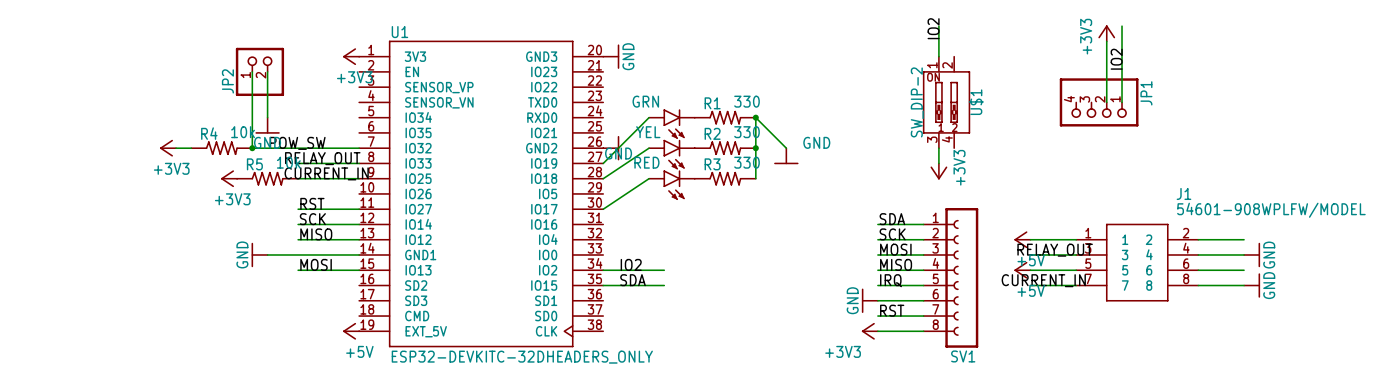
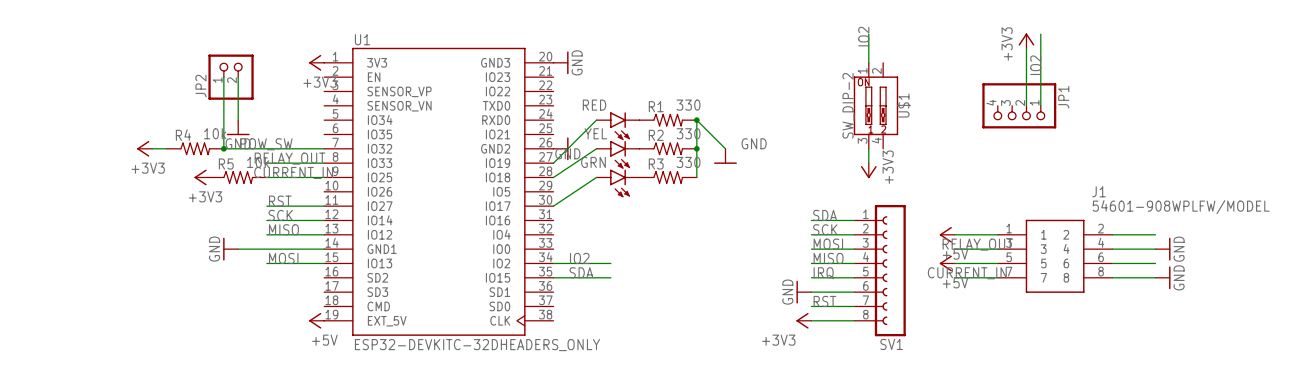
GRN name: GRN (645, 101) -> RED (594, 105)
RED name: RED (646, 162) -> GRN (593, 162)

